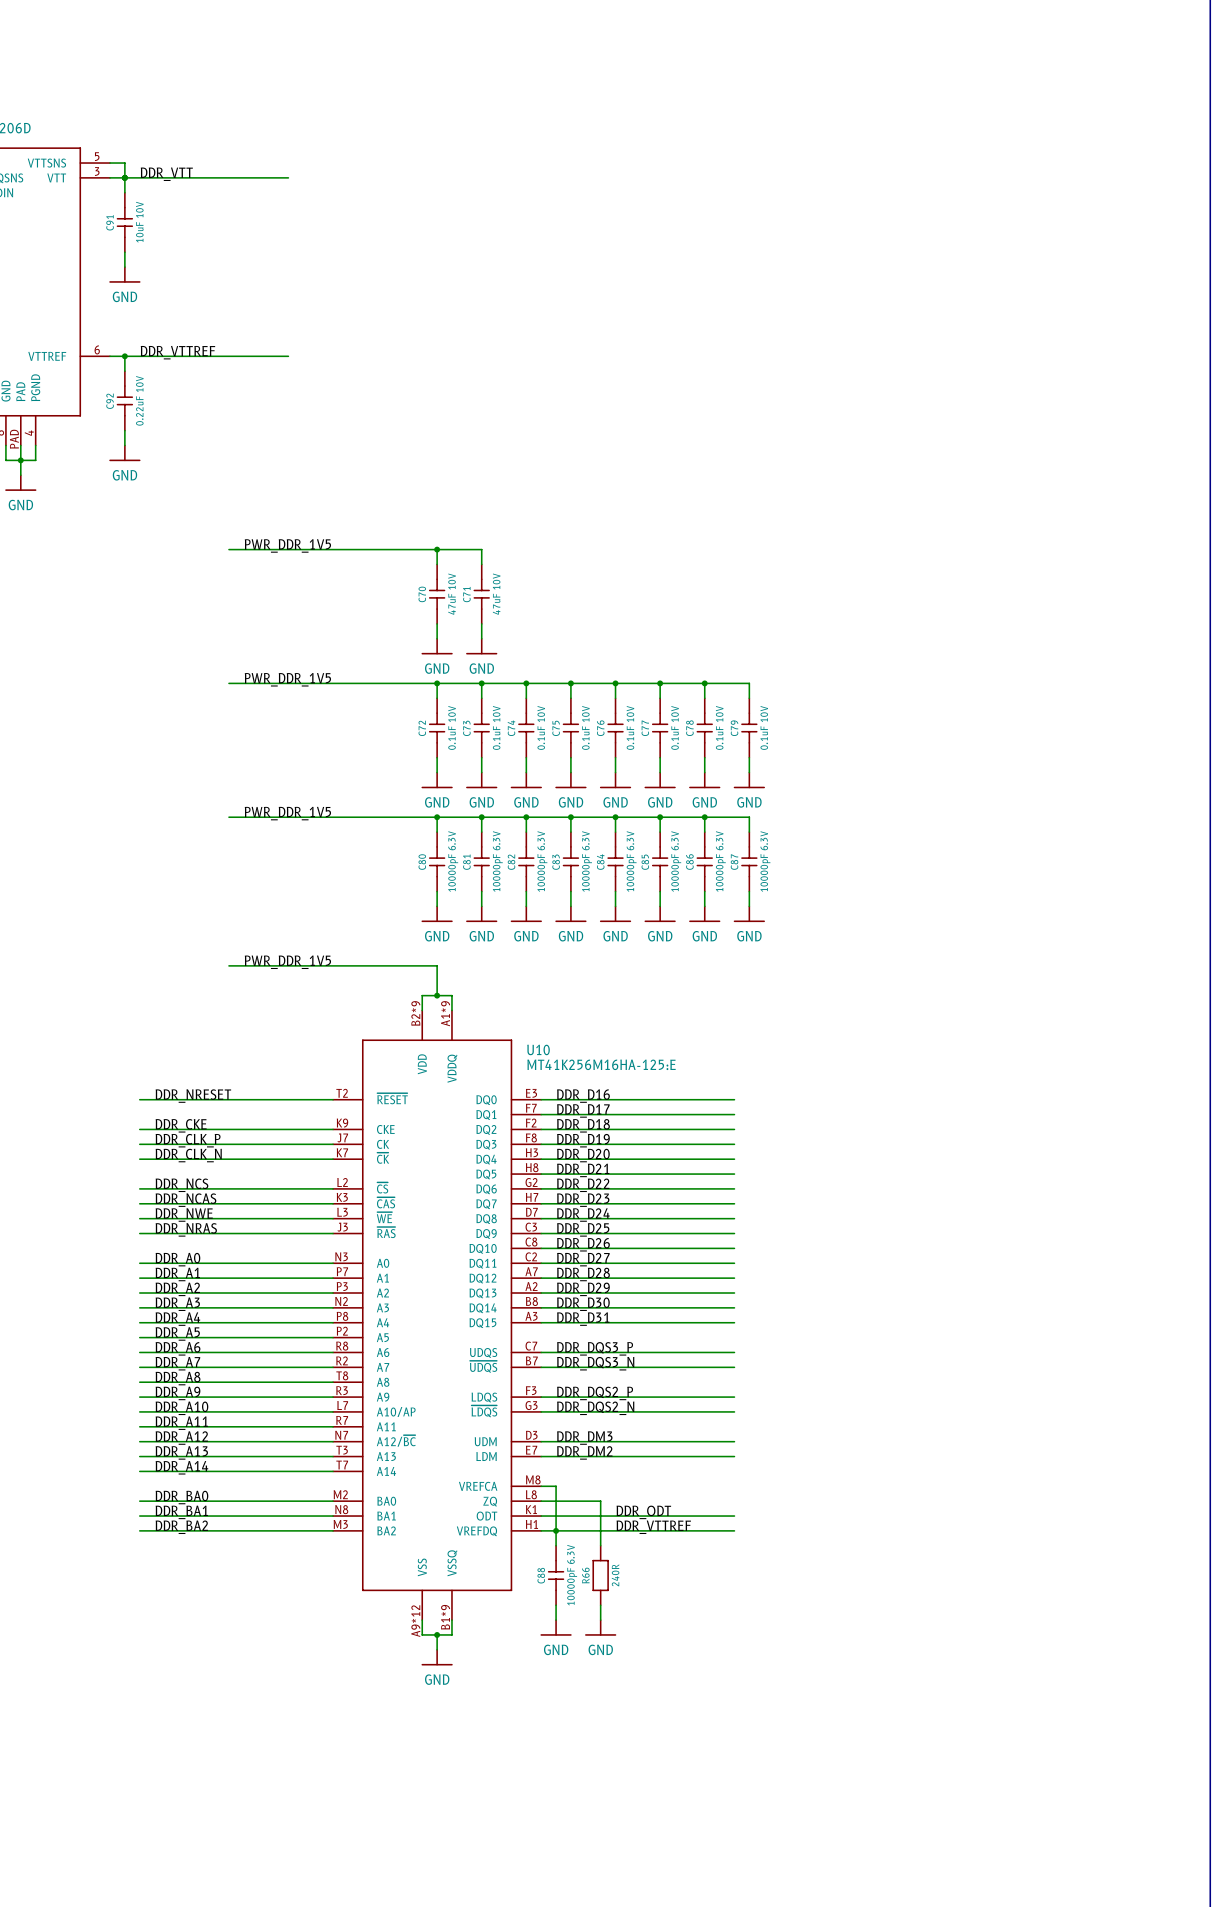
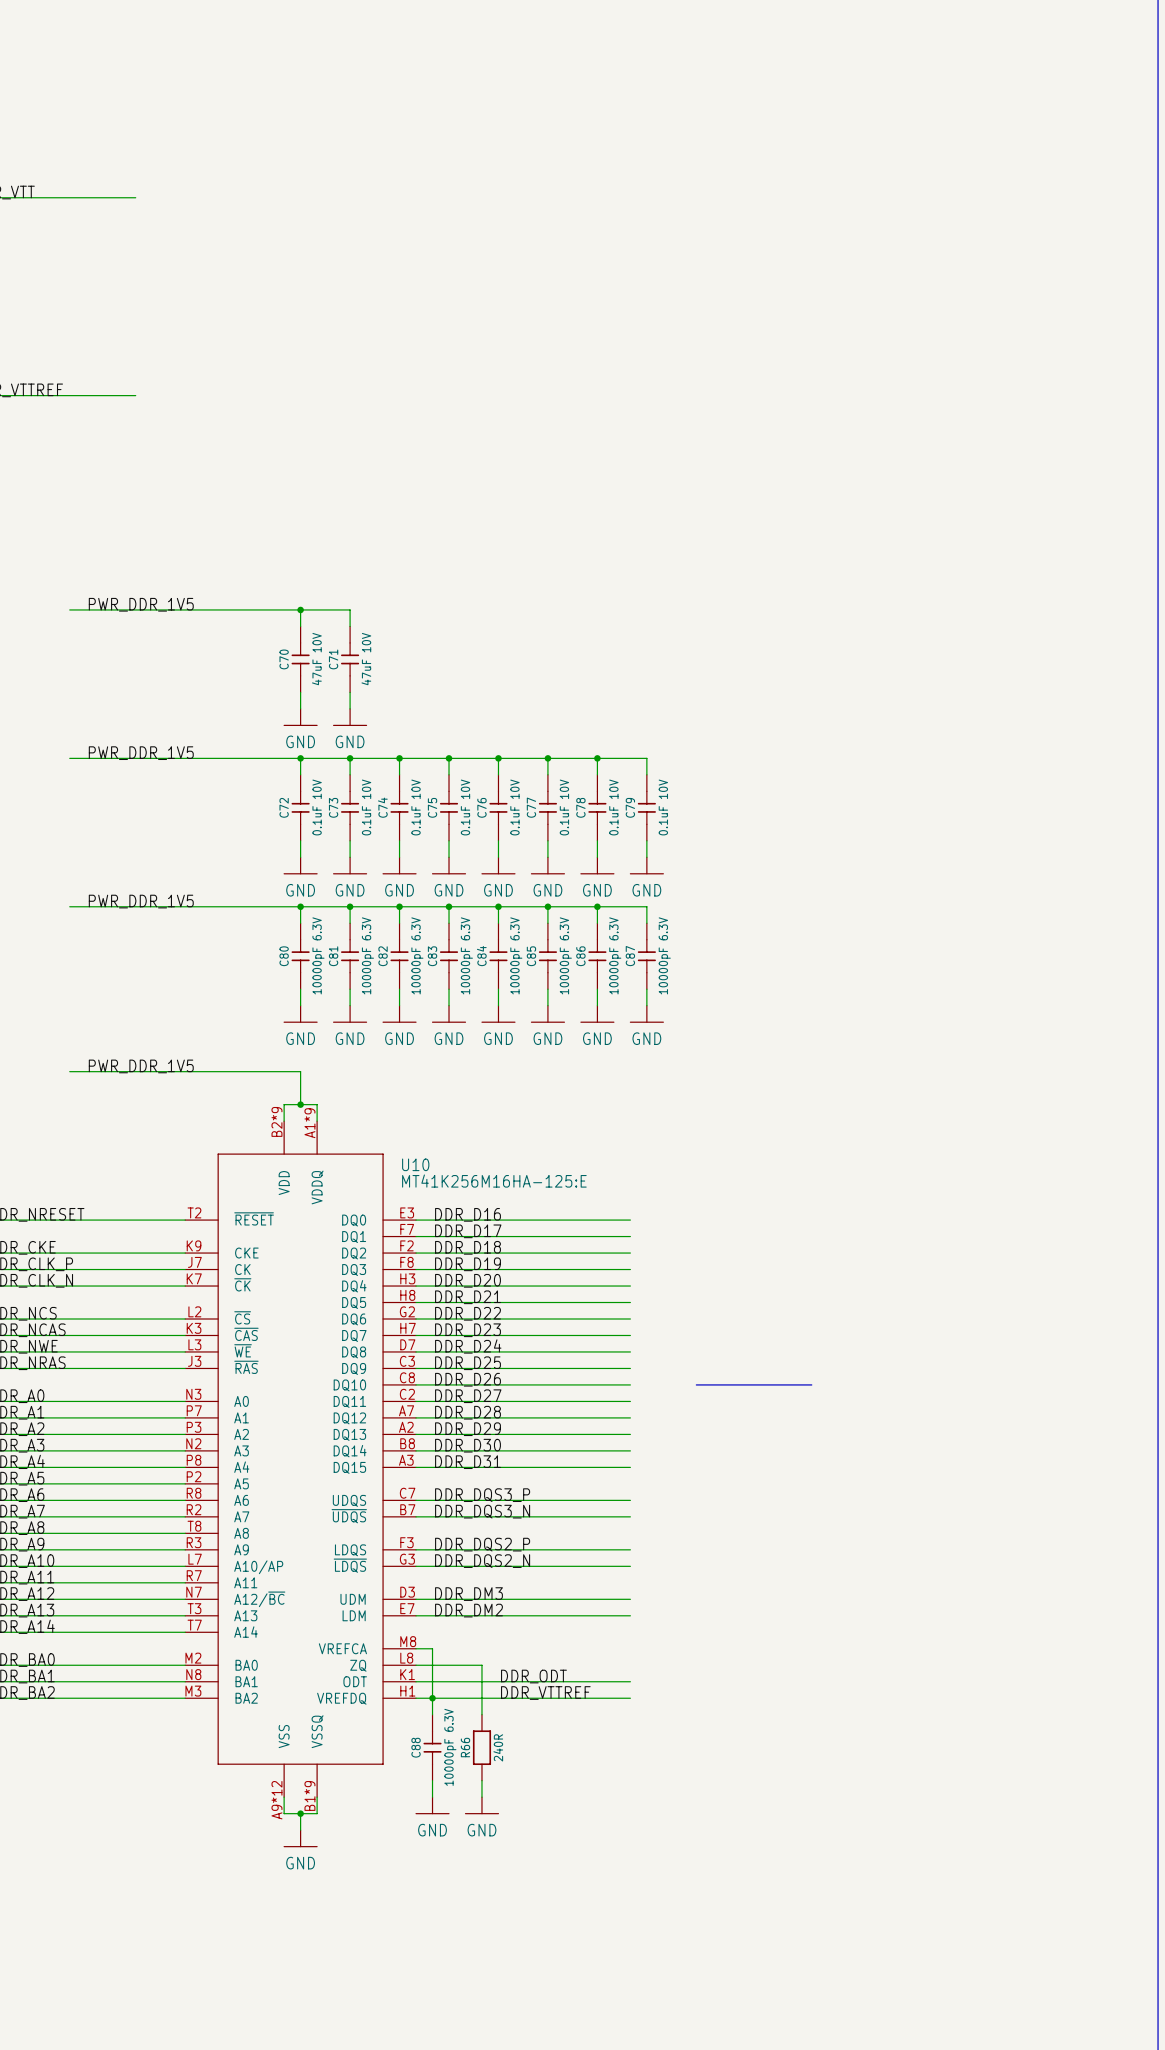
bus: none -> (696, 1384) (811, 1384)

